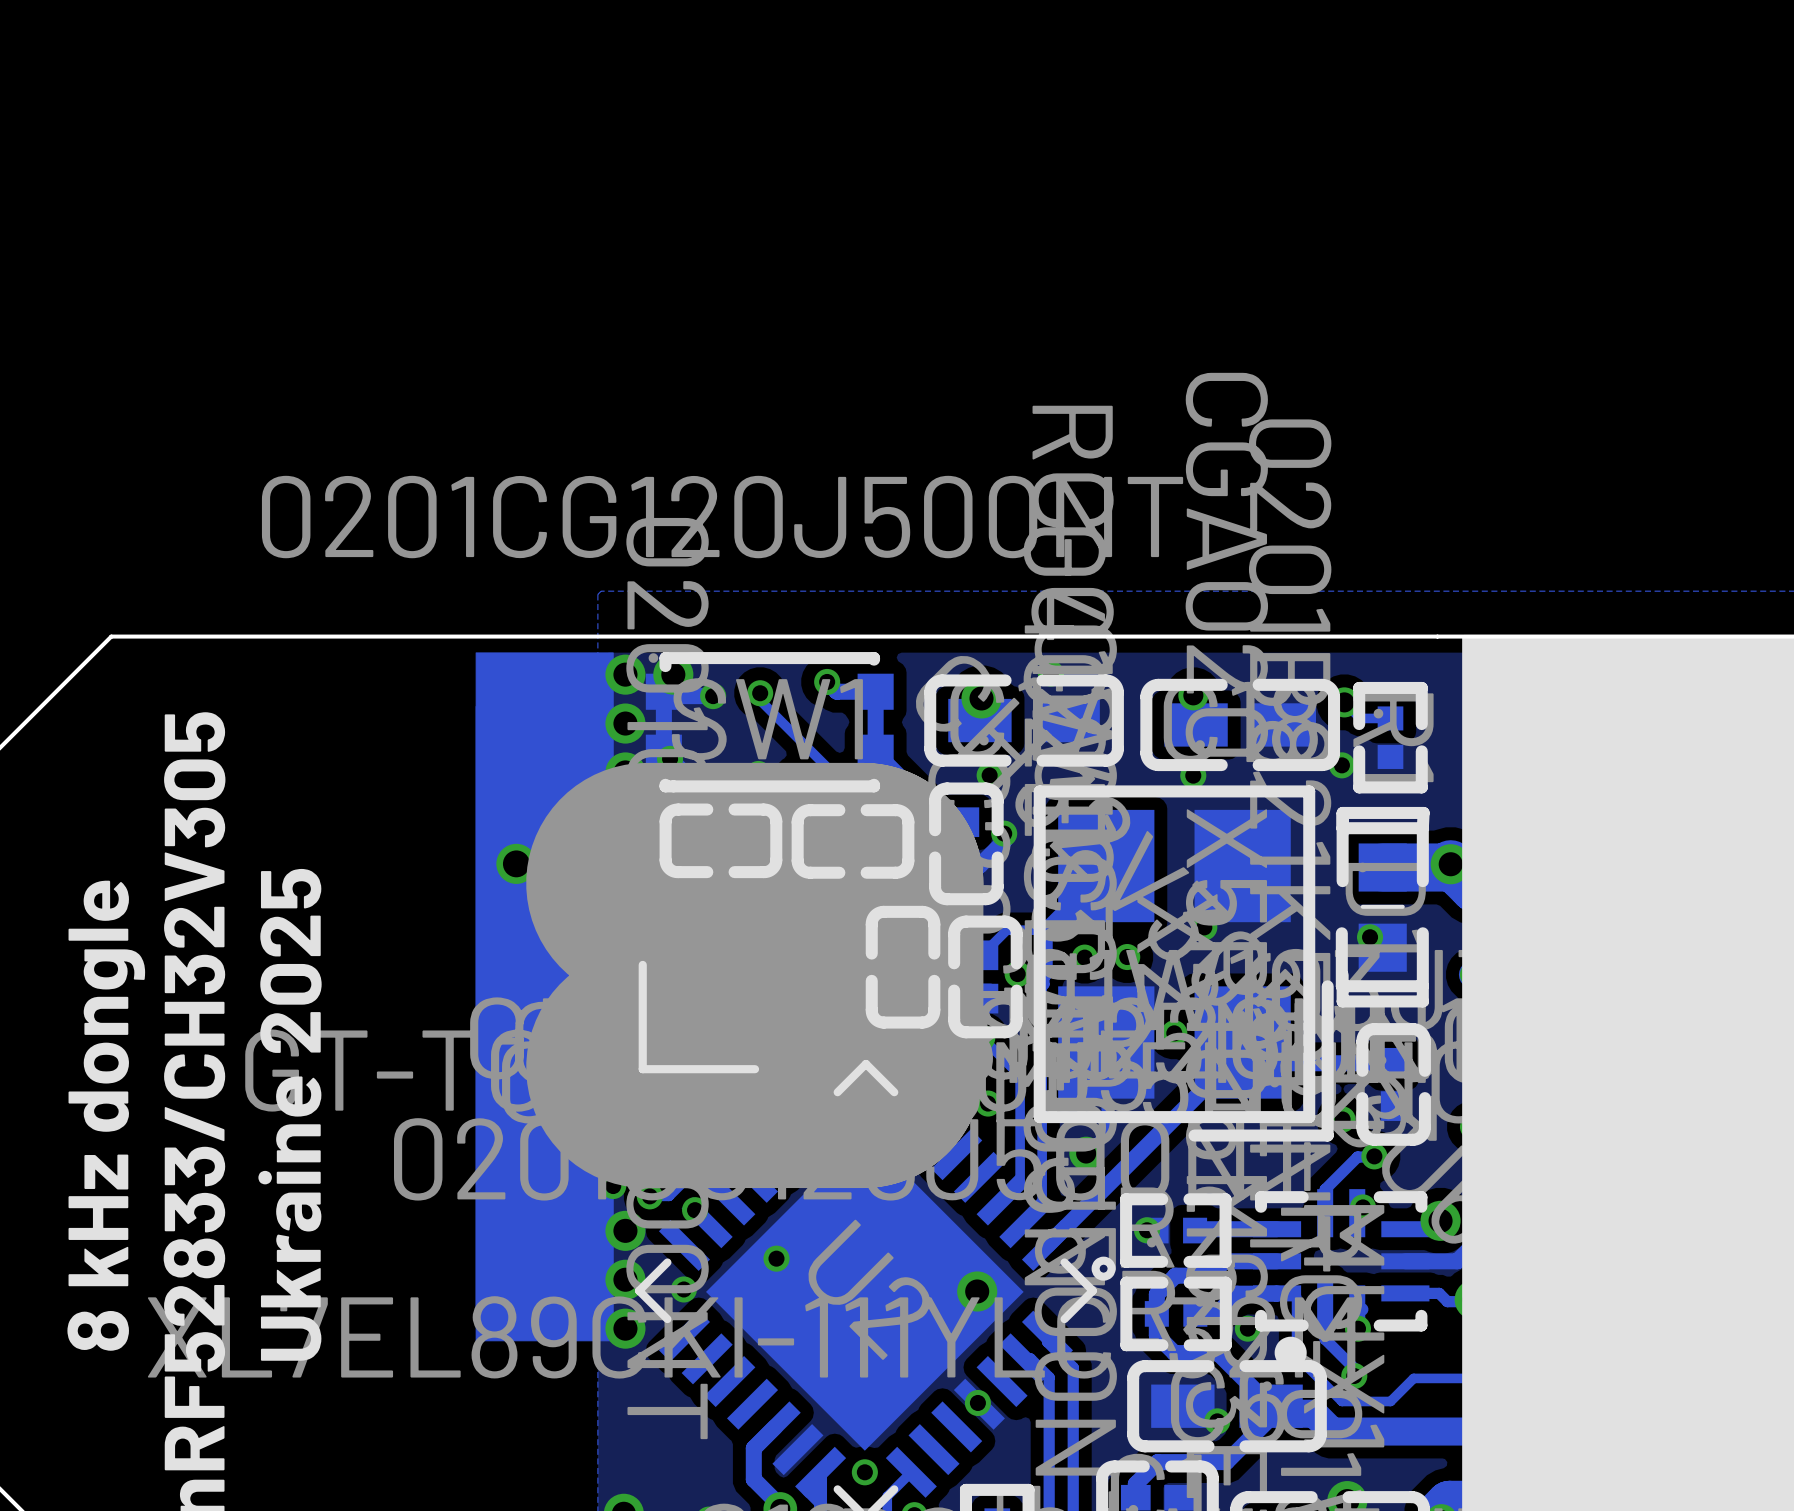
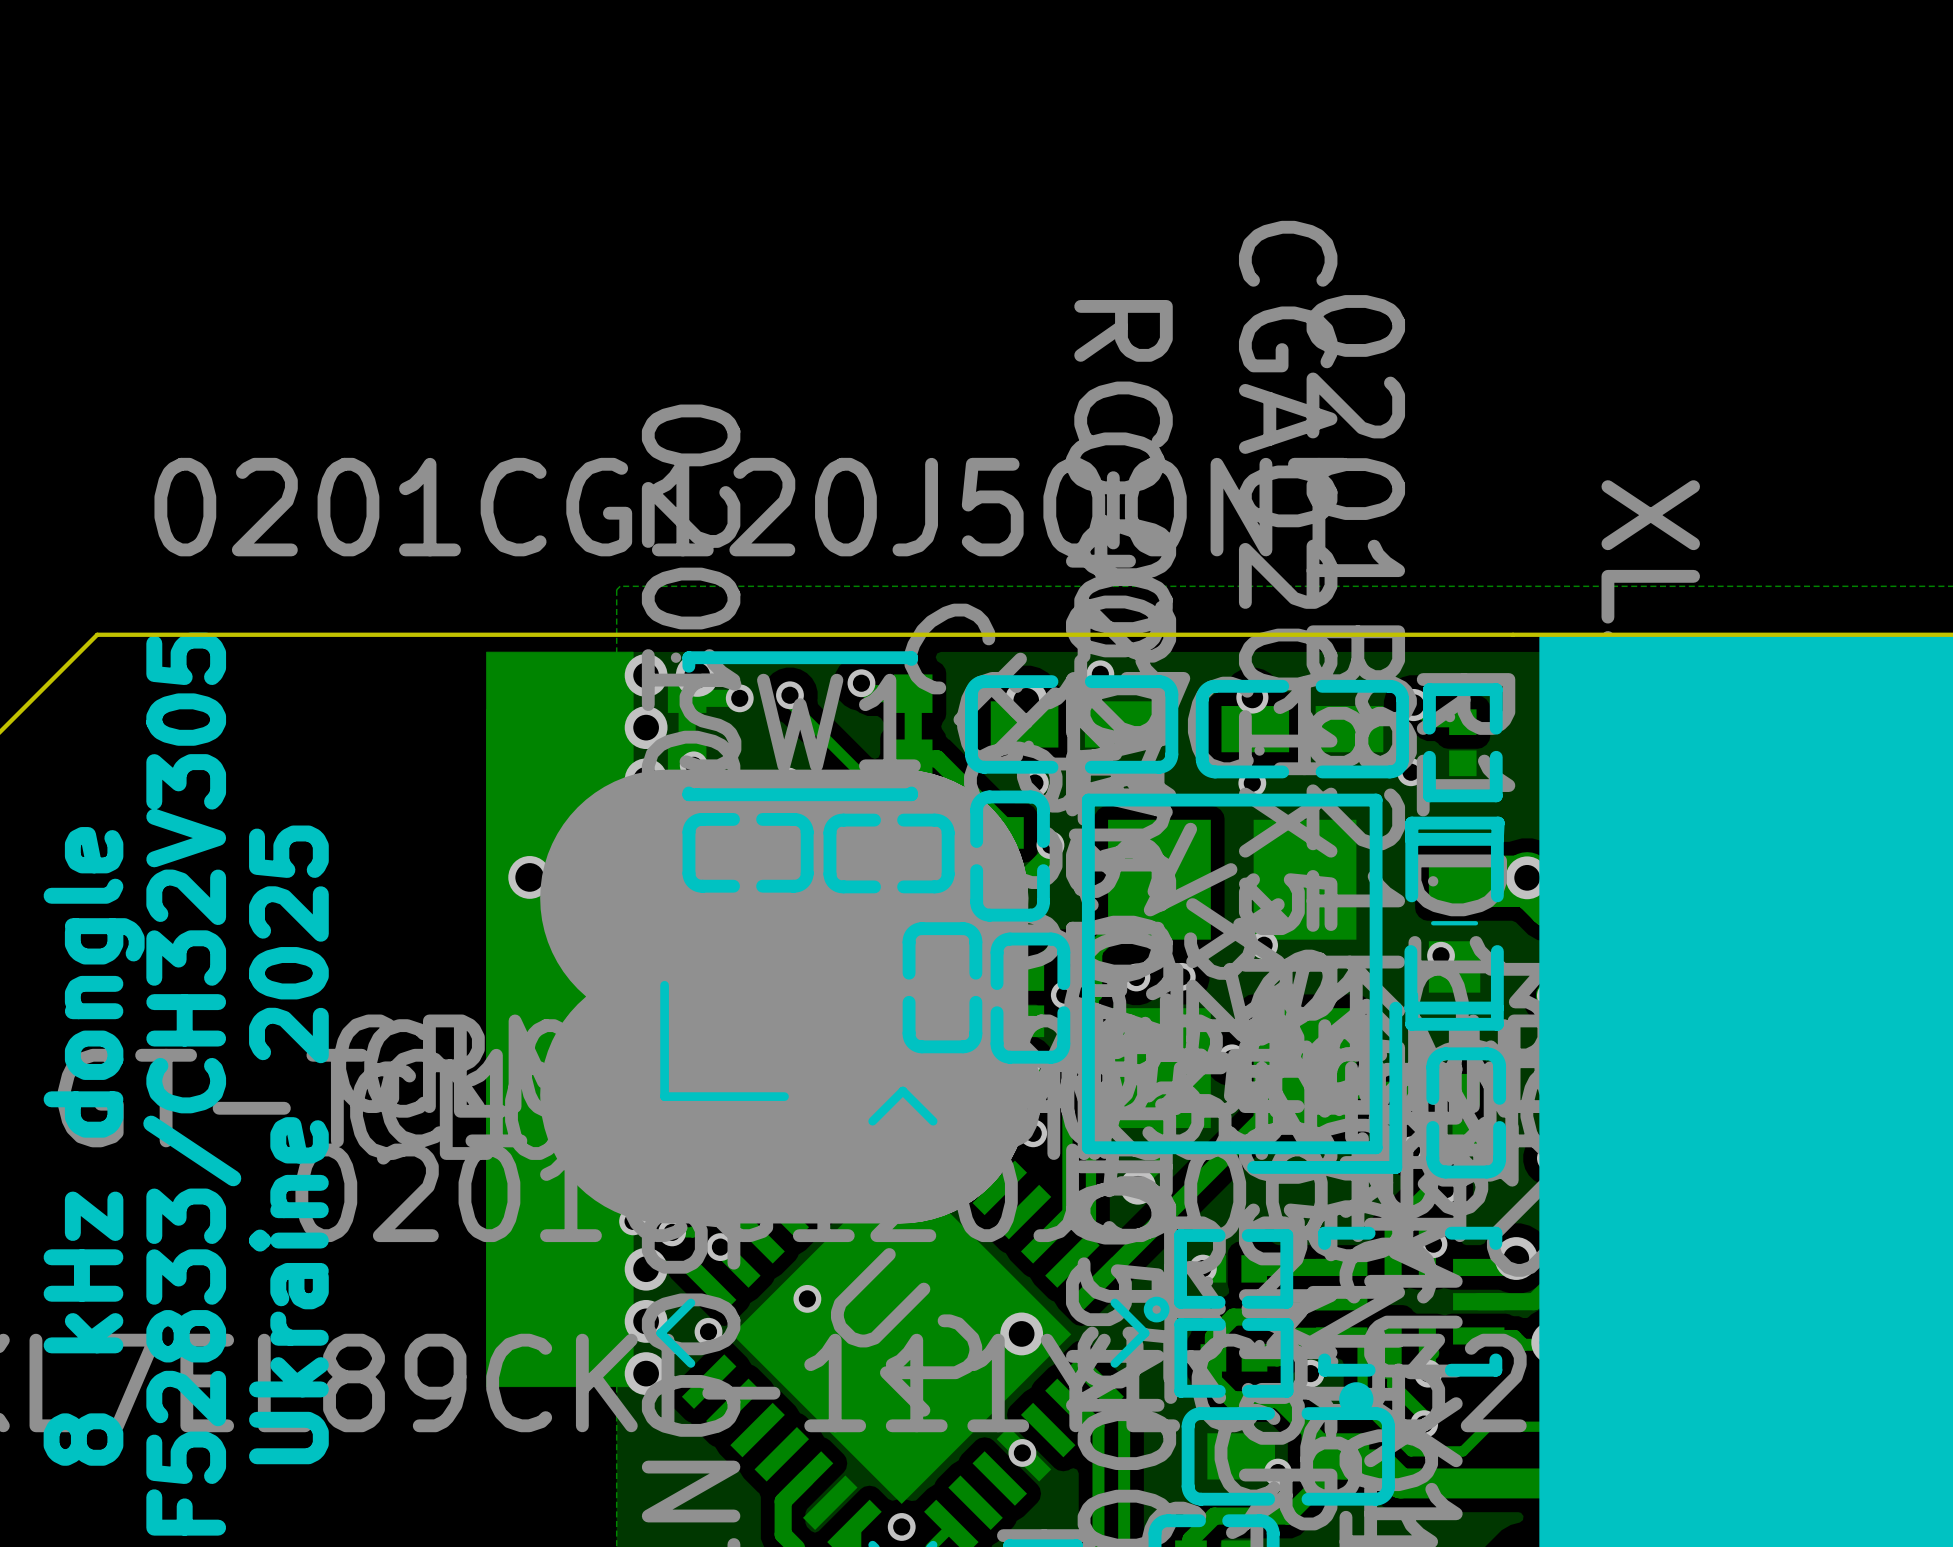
track: (875, 752) (945, 822) (966, 822) -> (913, 758) (937, 758) (1010, 831)

